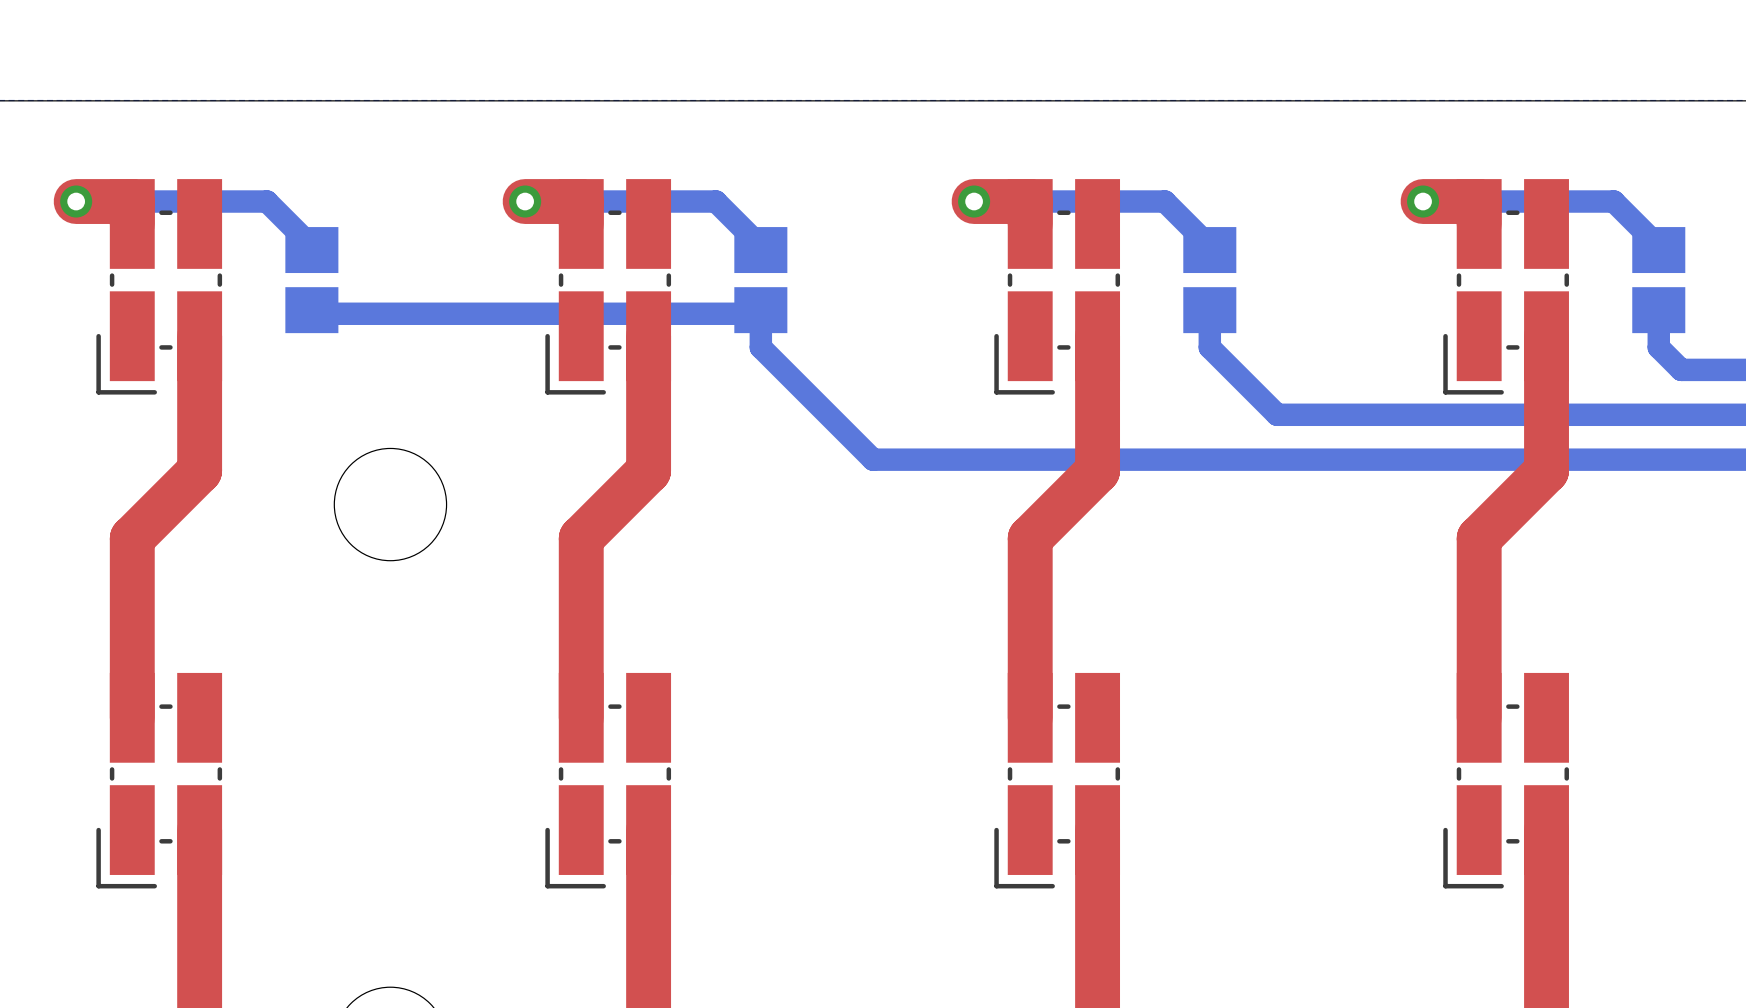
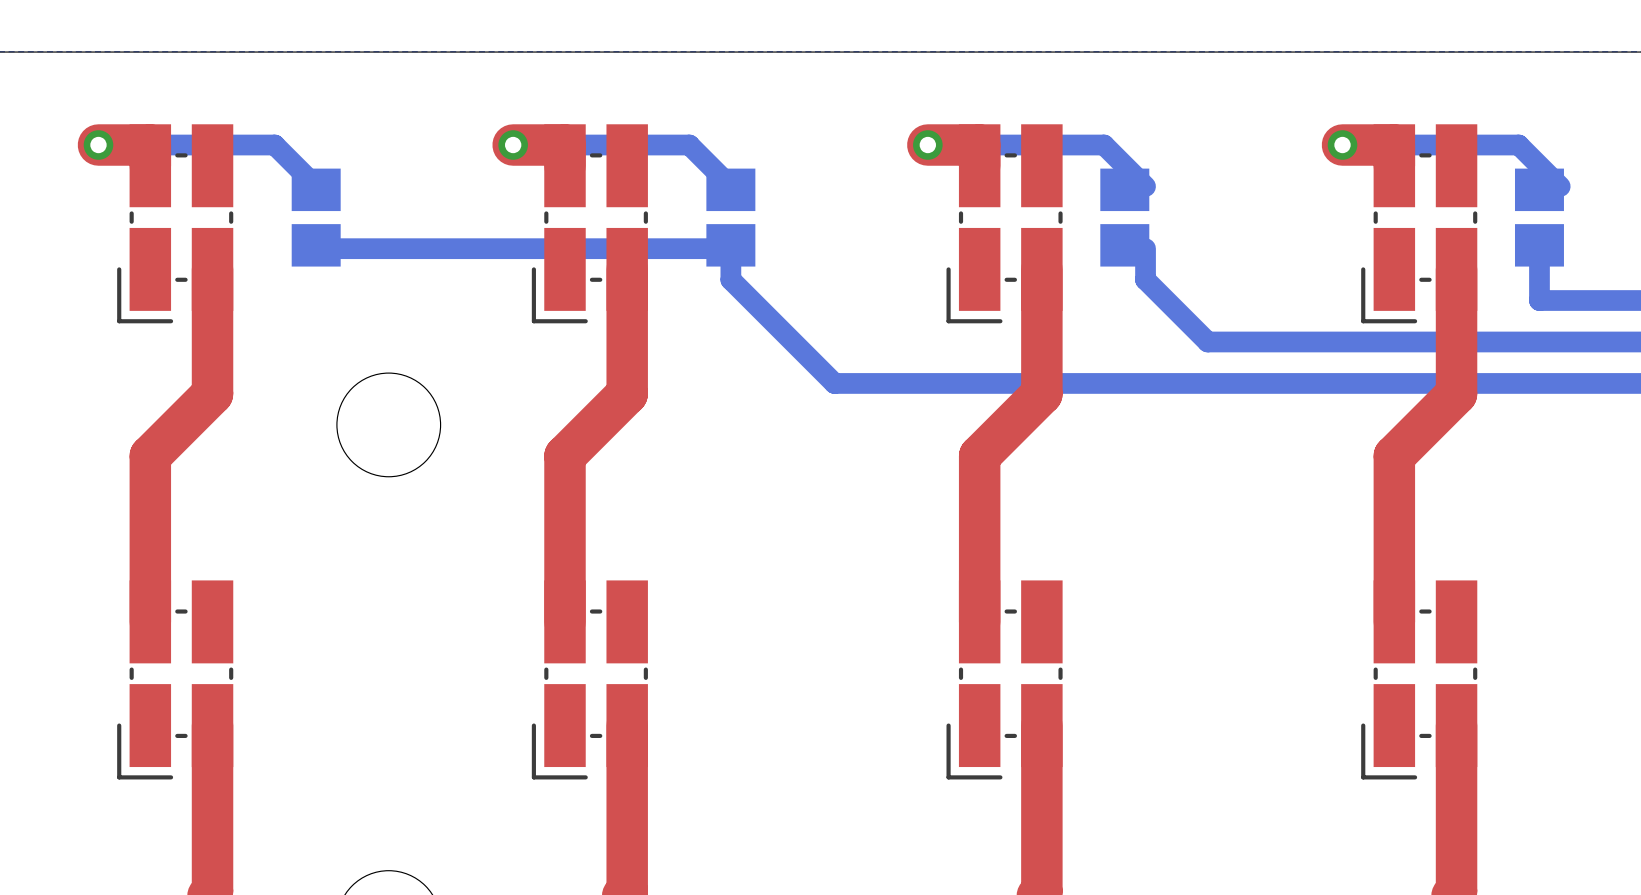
part position: (1209, 280) -> (1124, 217)
part position: (1658, 280) -> (1539, 217)
bottom track: (1658, 313) (1658, 347) (1681, 369) -> (1539, 248) (1539, 300) (1580, 300)

